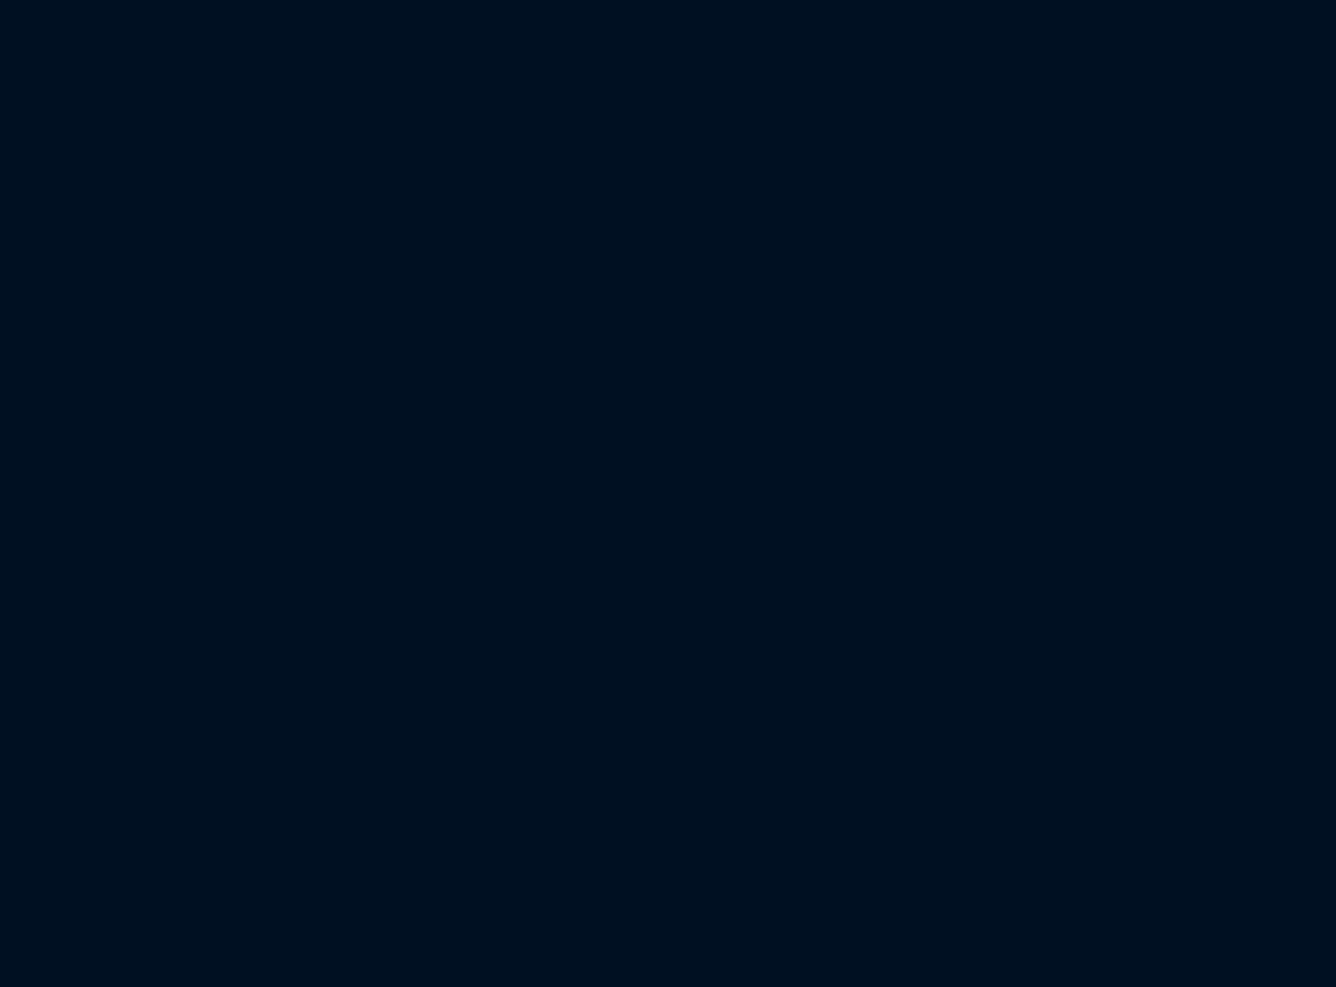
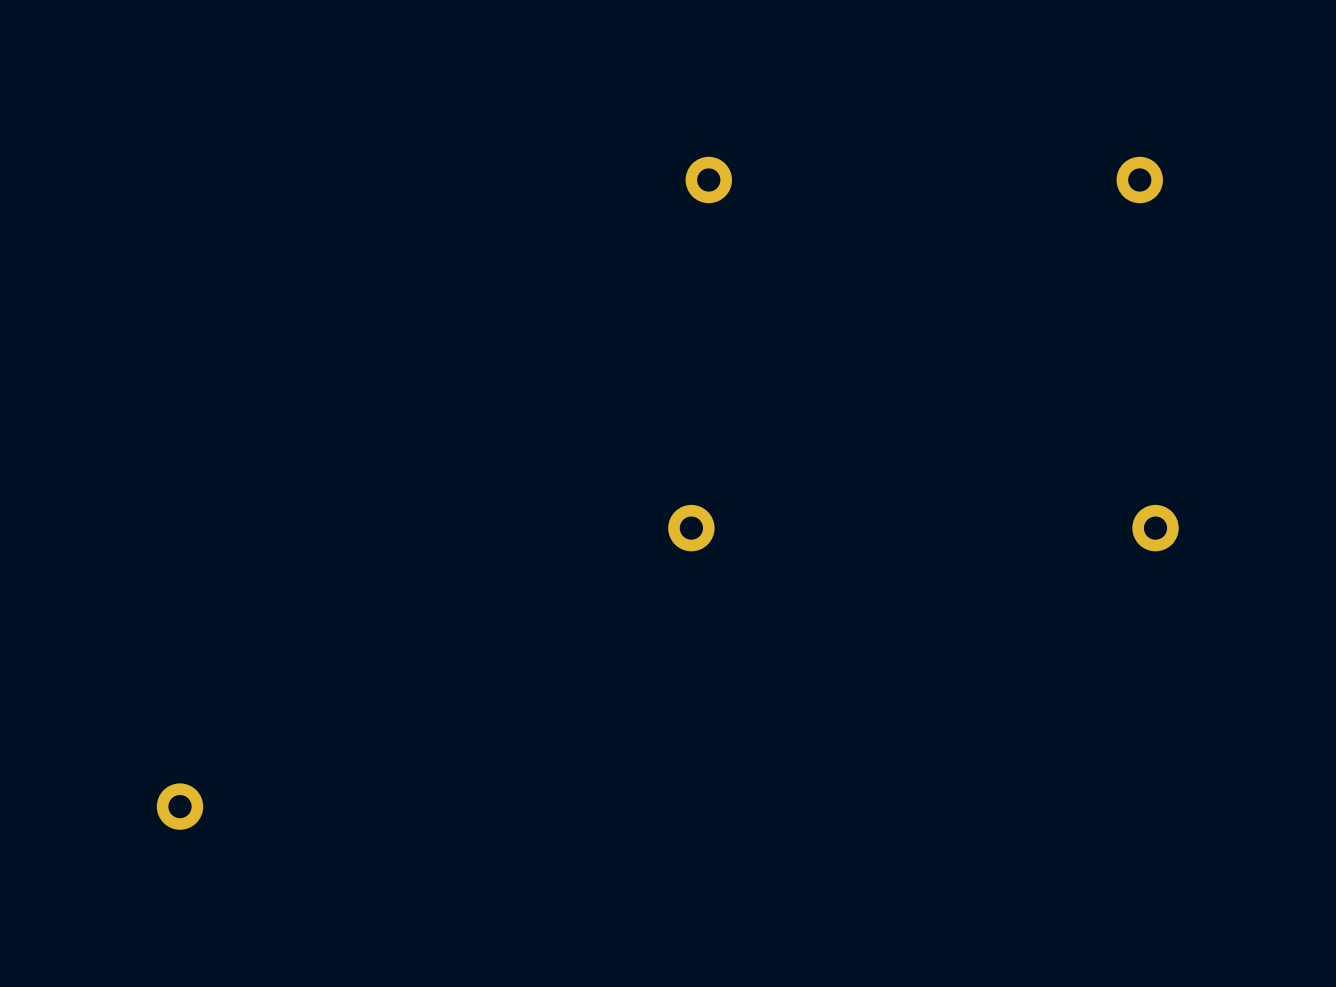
part: none -> (708, 180)
part: none -> (1139, 180)
part: none -> (691, 528)
part: none -> (1155, 528)
part: none -> (180, 806)

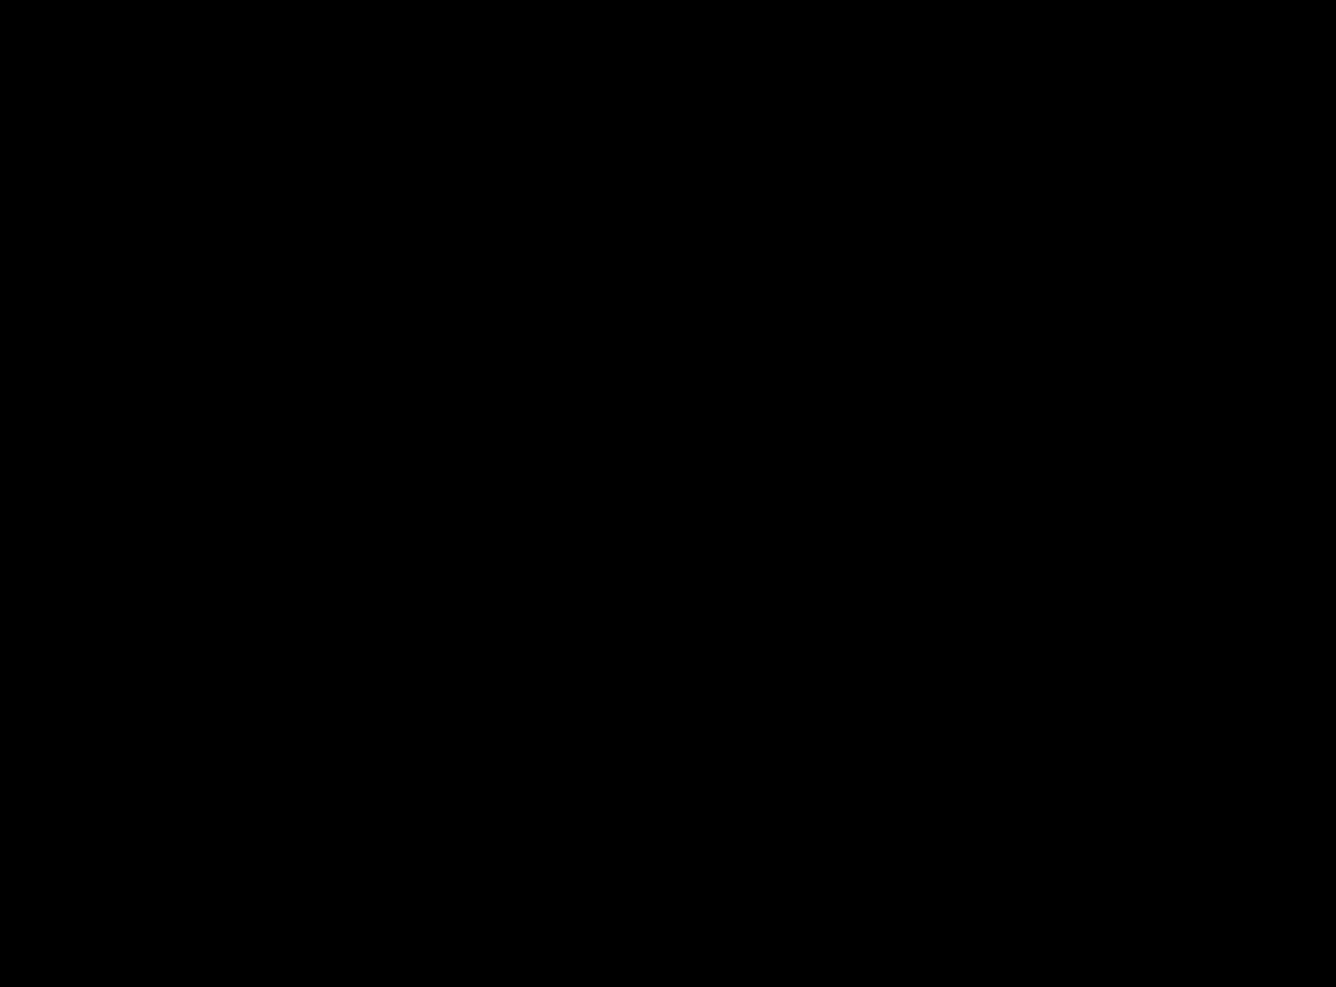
part: (708, 180) -> none
part: (1139, 180) -> none
part: (691, 528) -> none
part: (1155, 528) -> none
part: (180, 806) -> none

